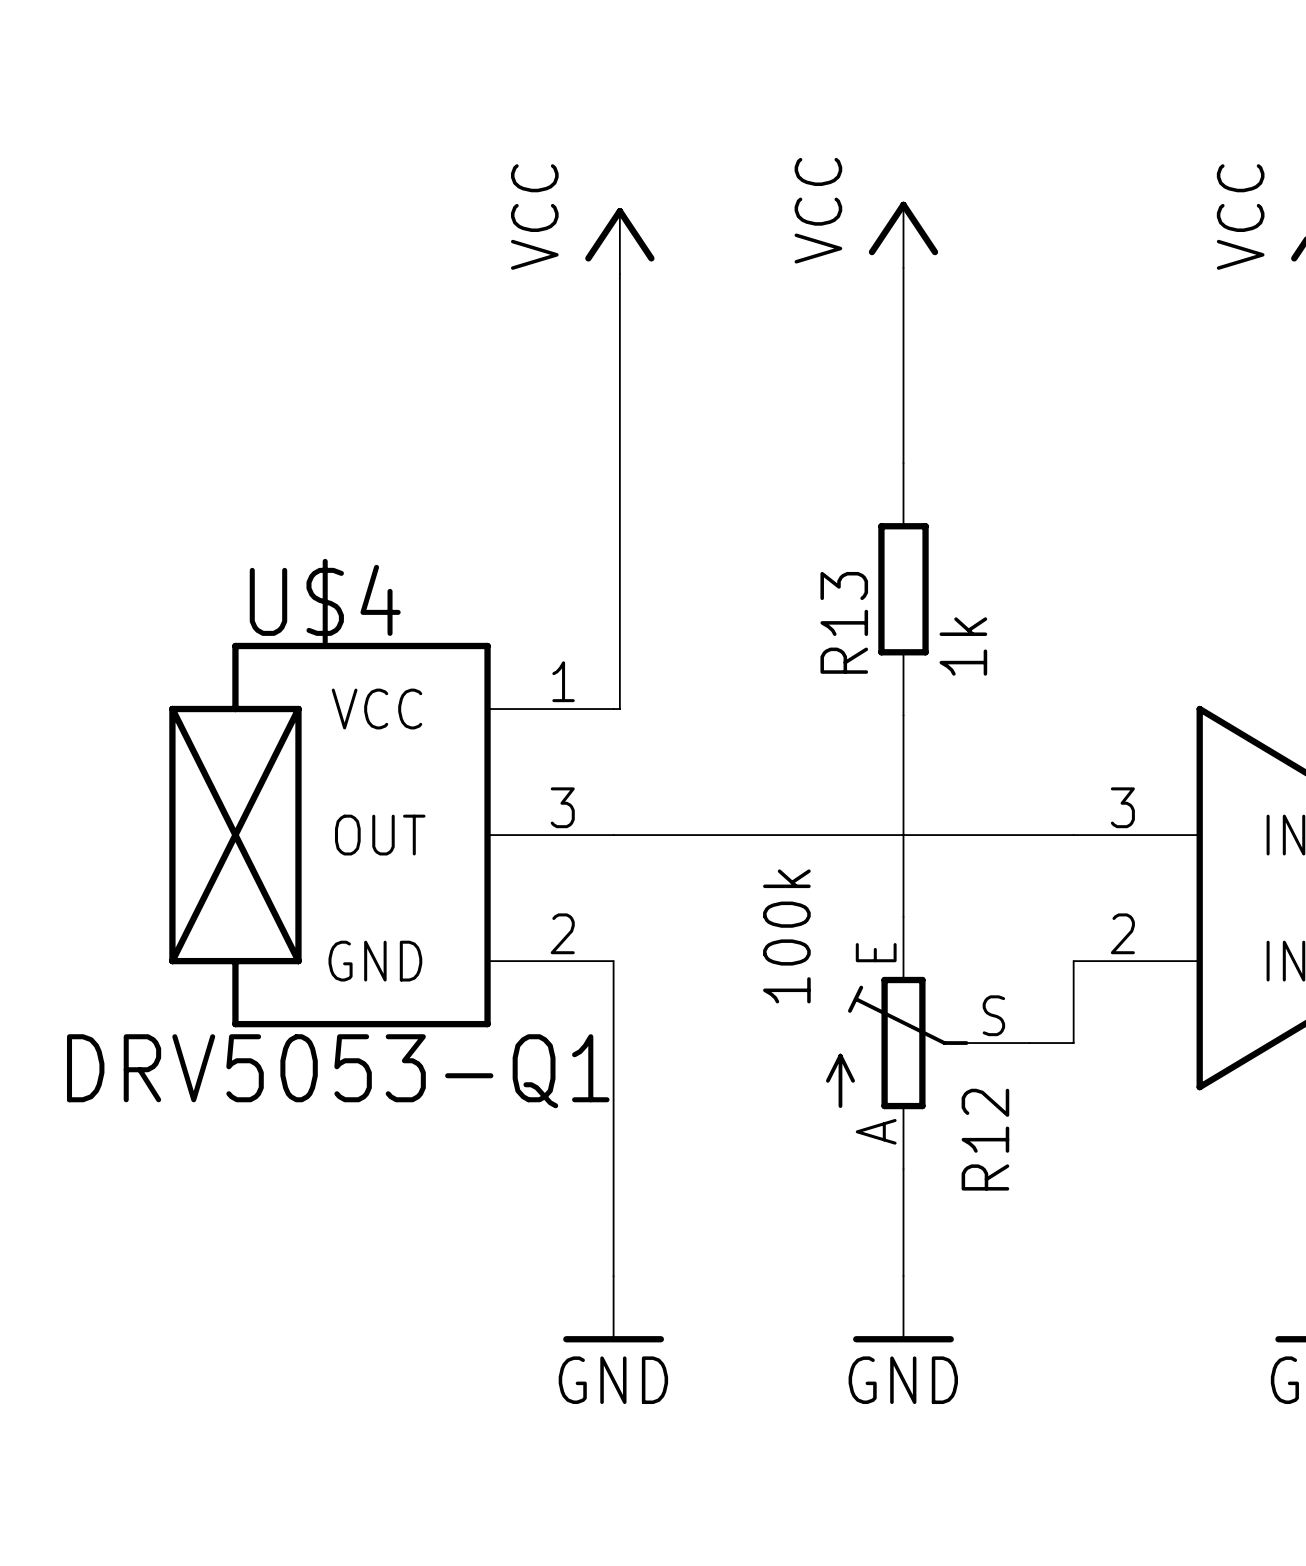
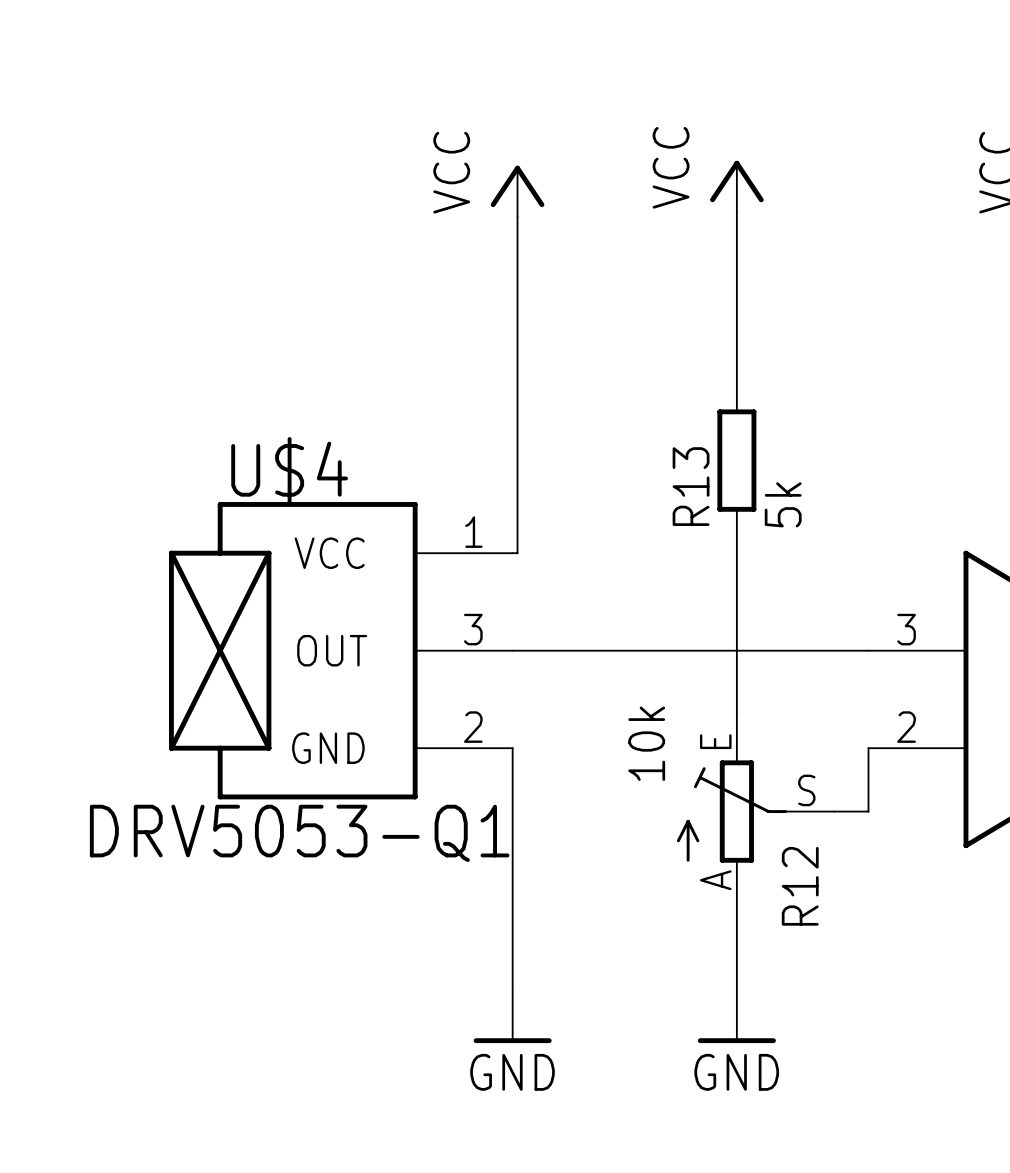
R13 value: 1k (963, 646) -> 5k (783, 504)
R12 value: 100k (786, 936) -> 10k (646, 743)

